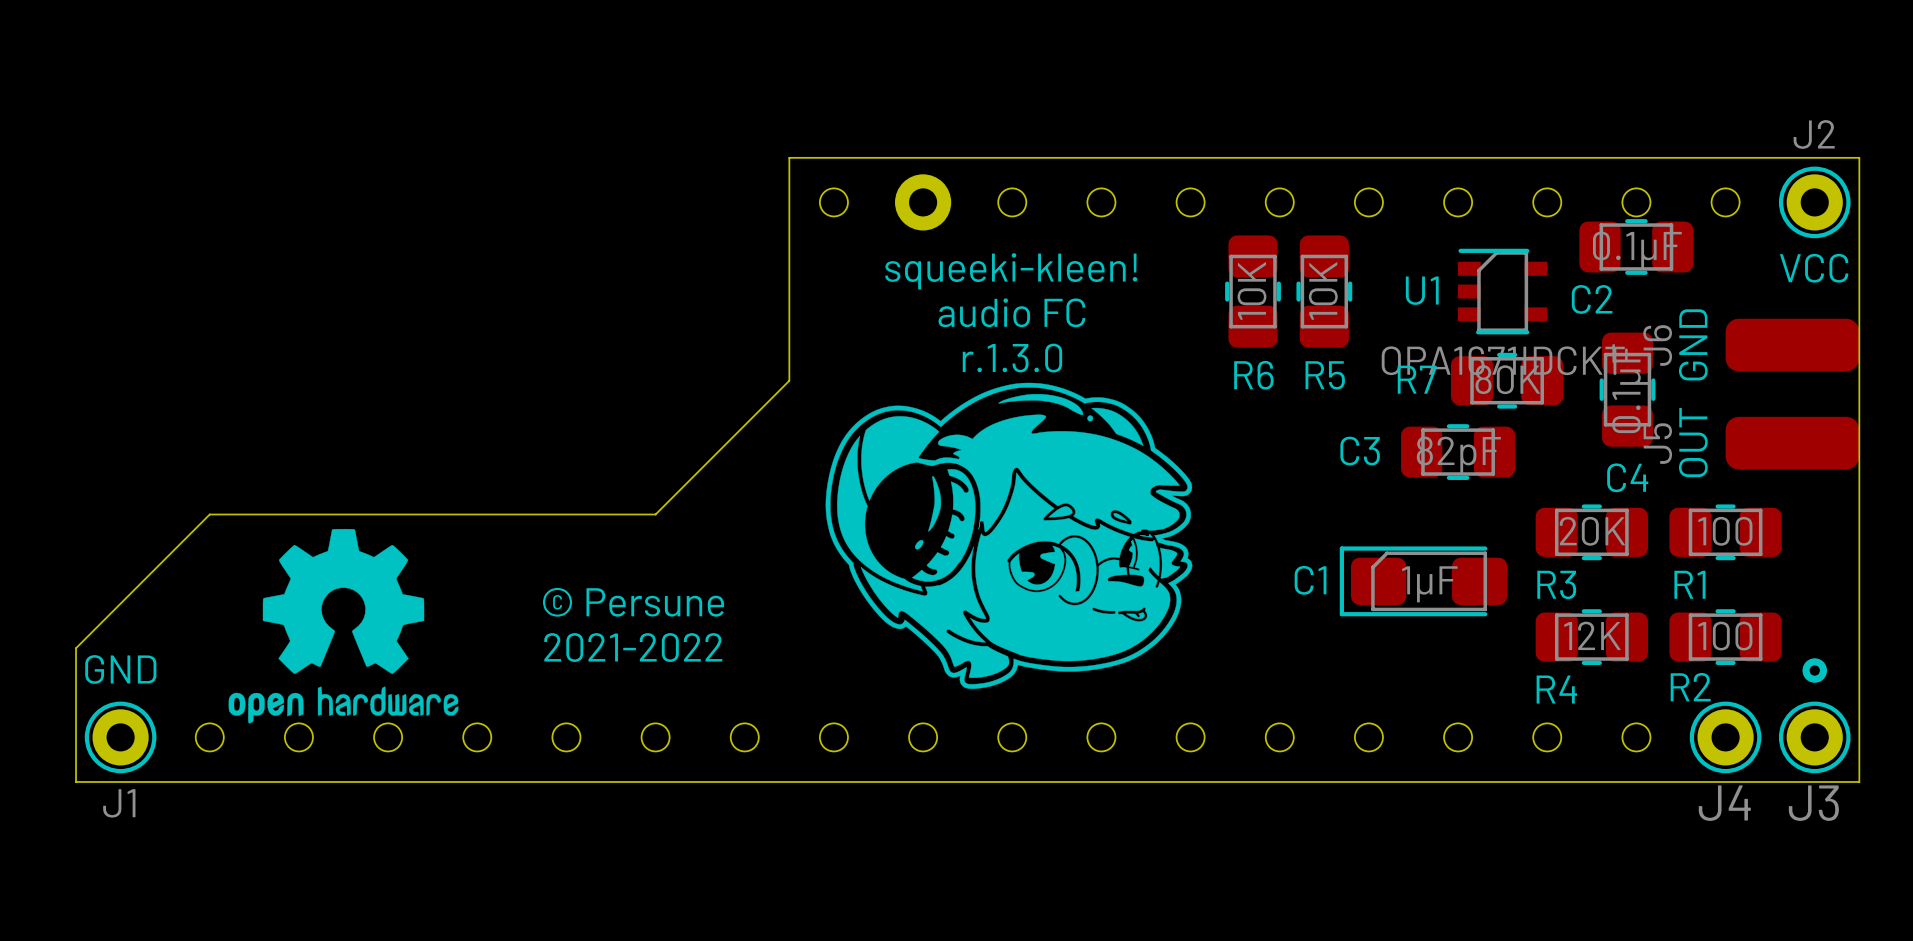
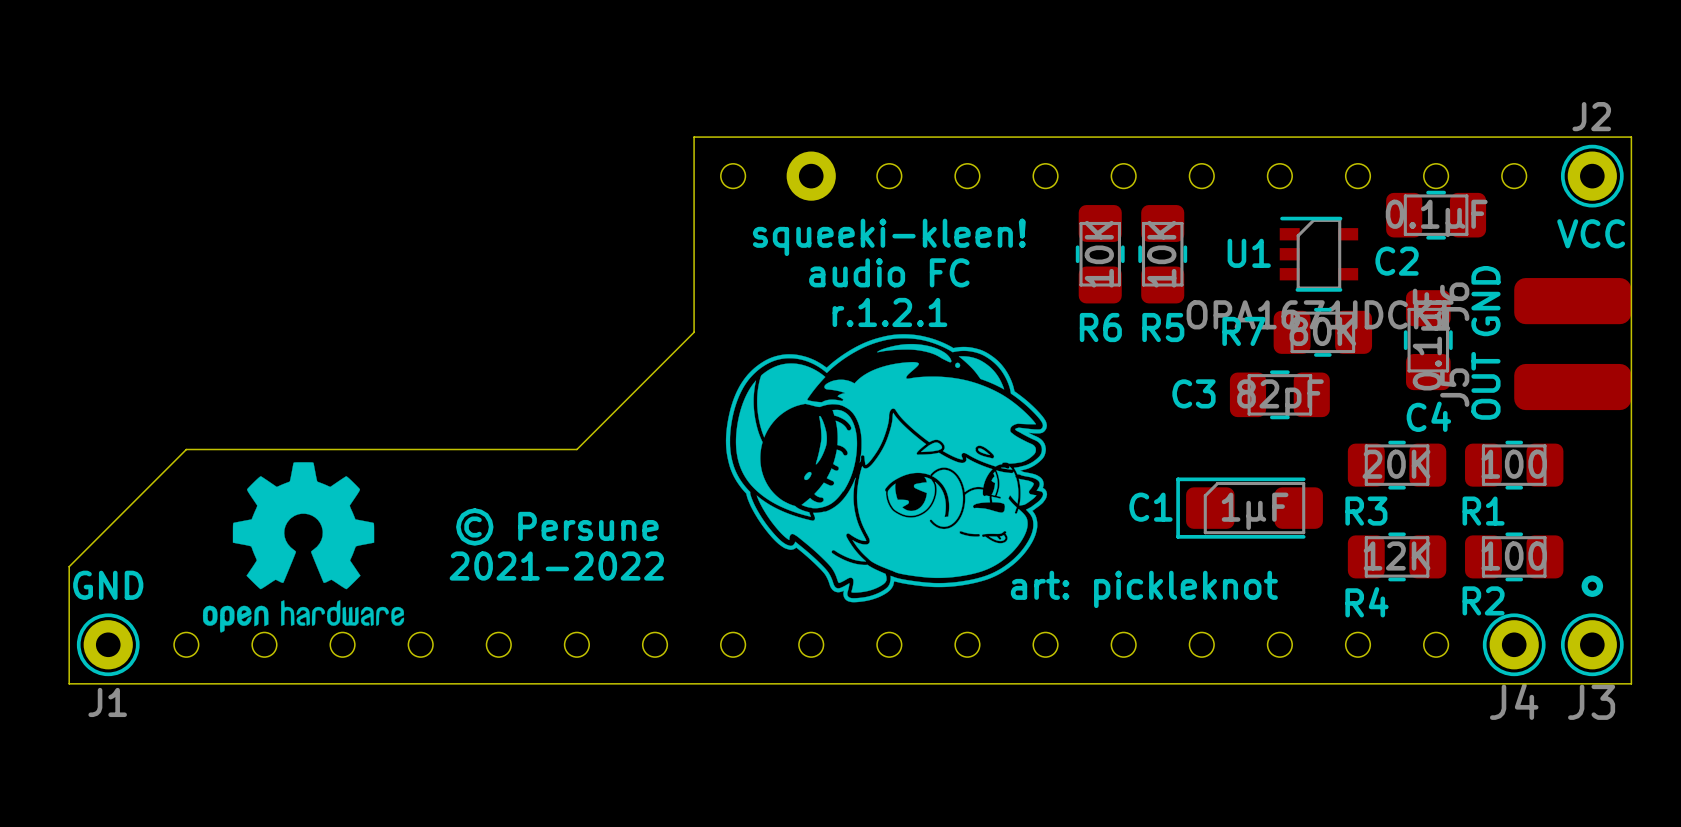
text: r.1.3.0 (1012, 358) -> r.1.2.1 (889, 312)
text: none -> art: pickleknot (1144, 589)

